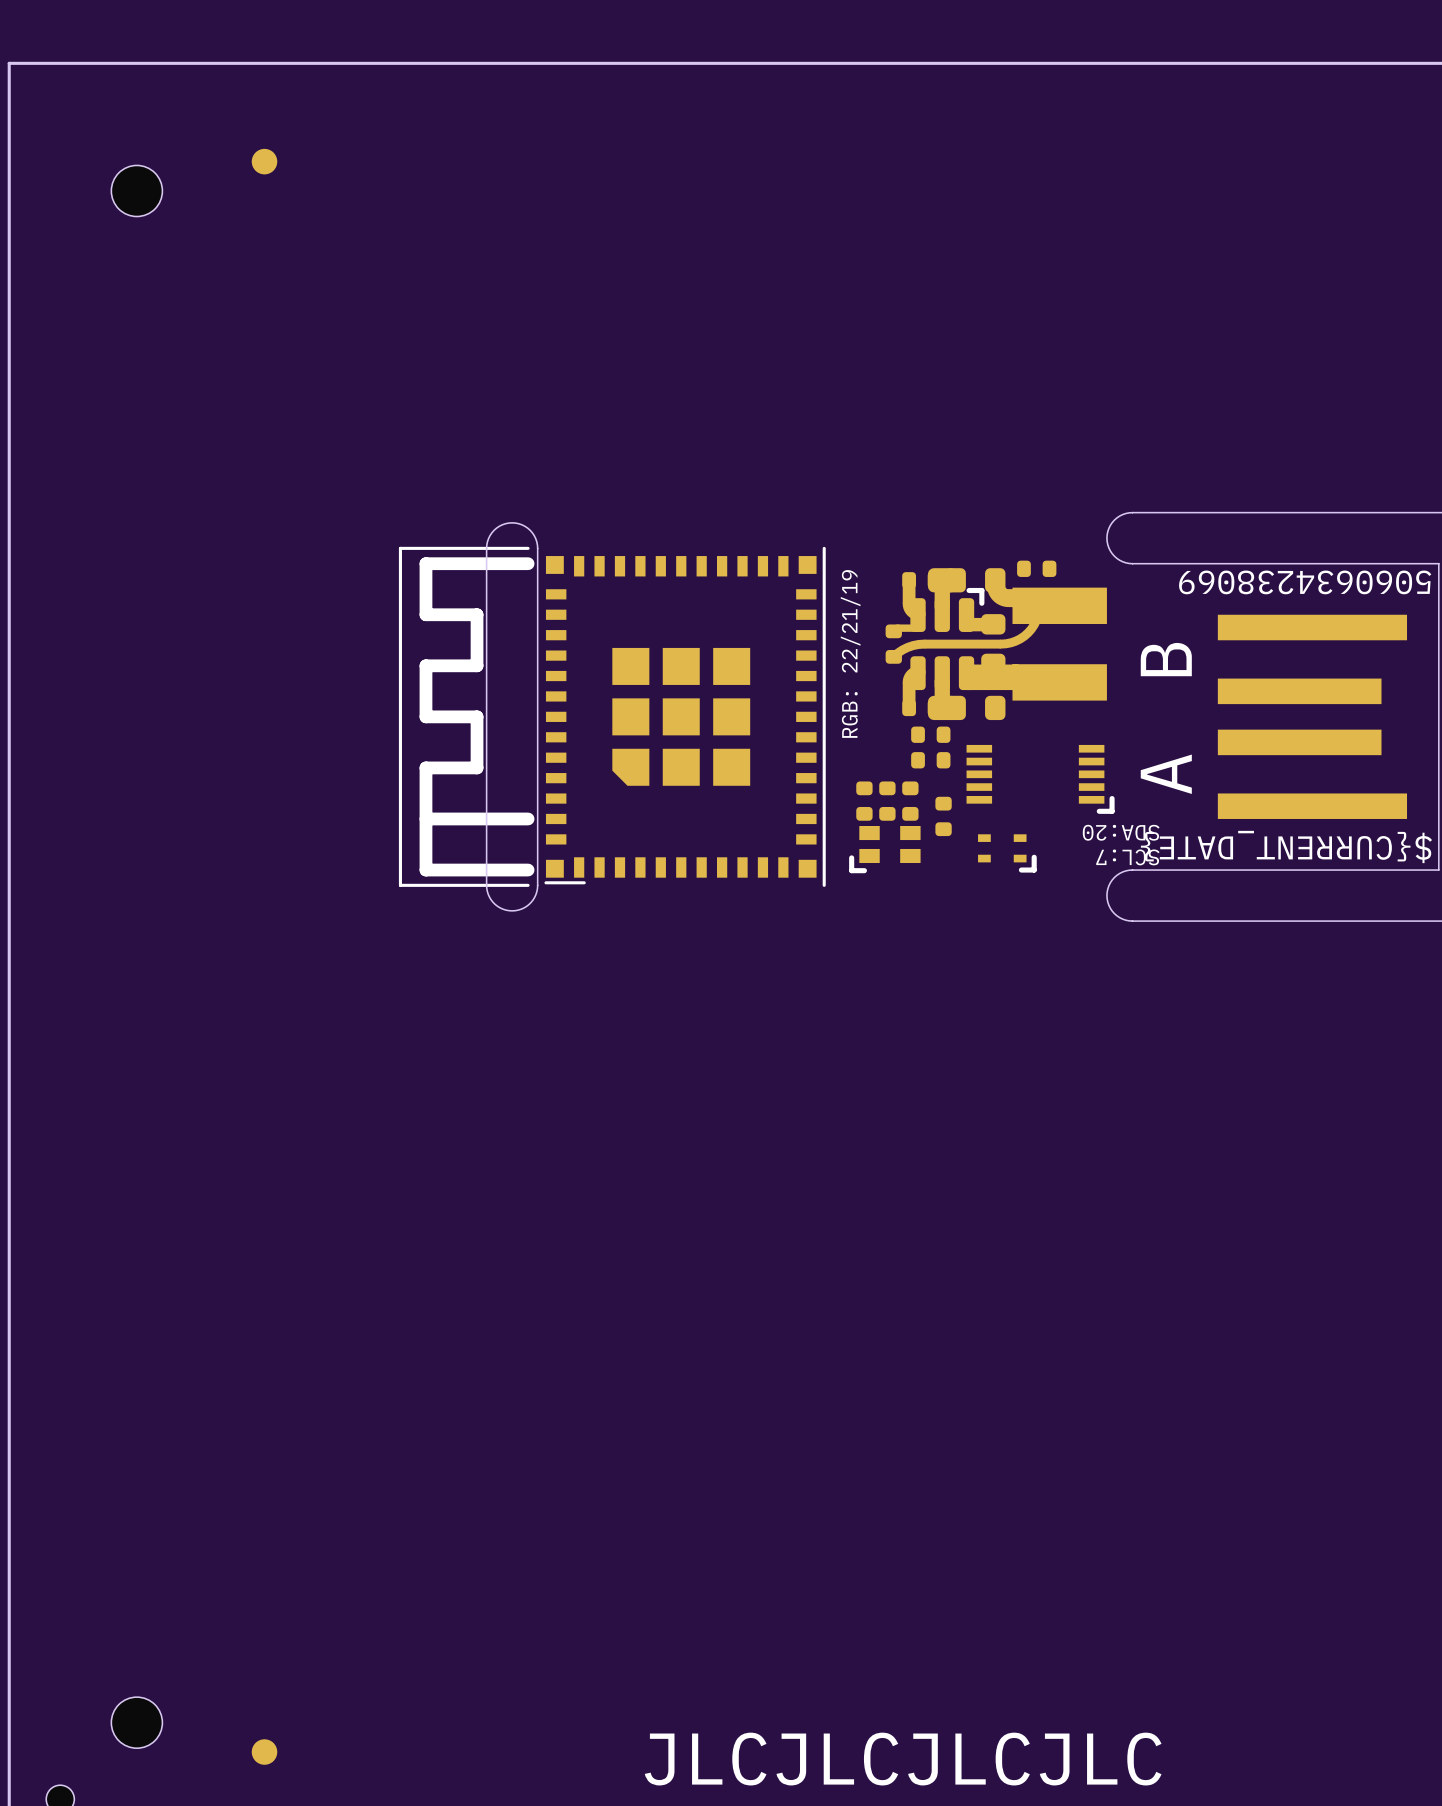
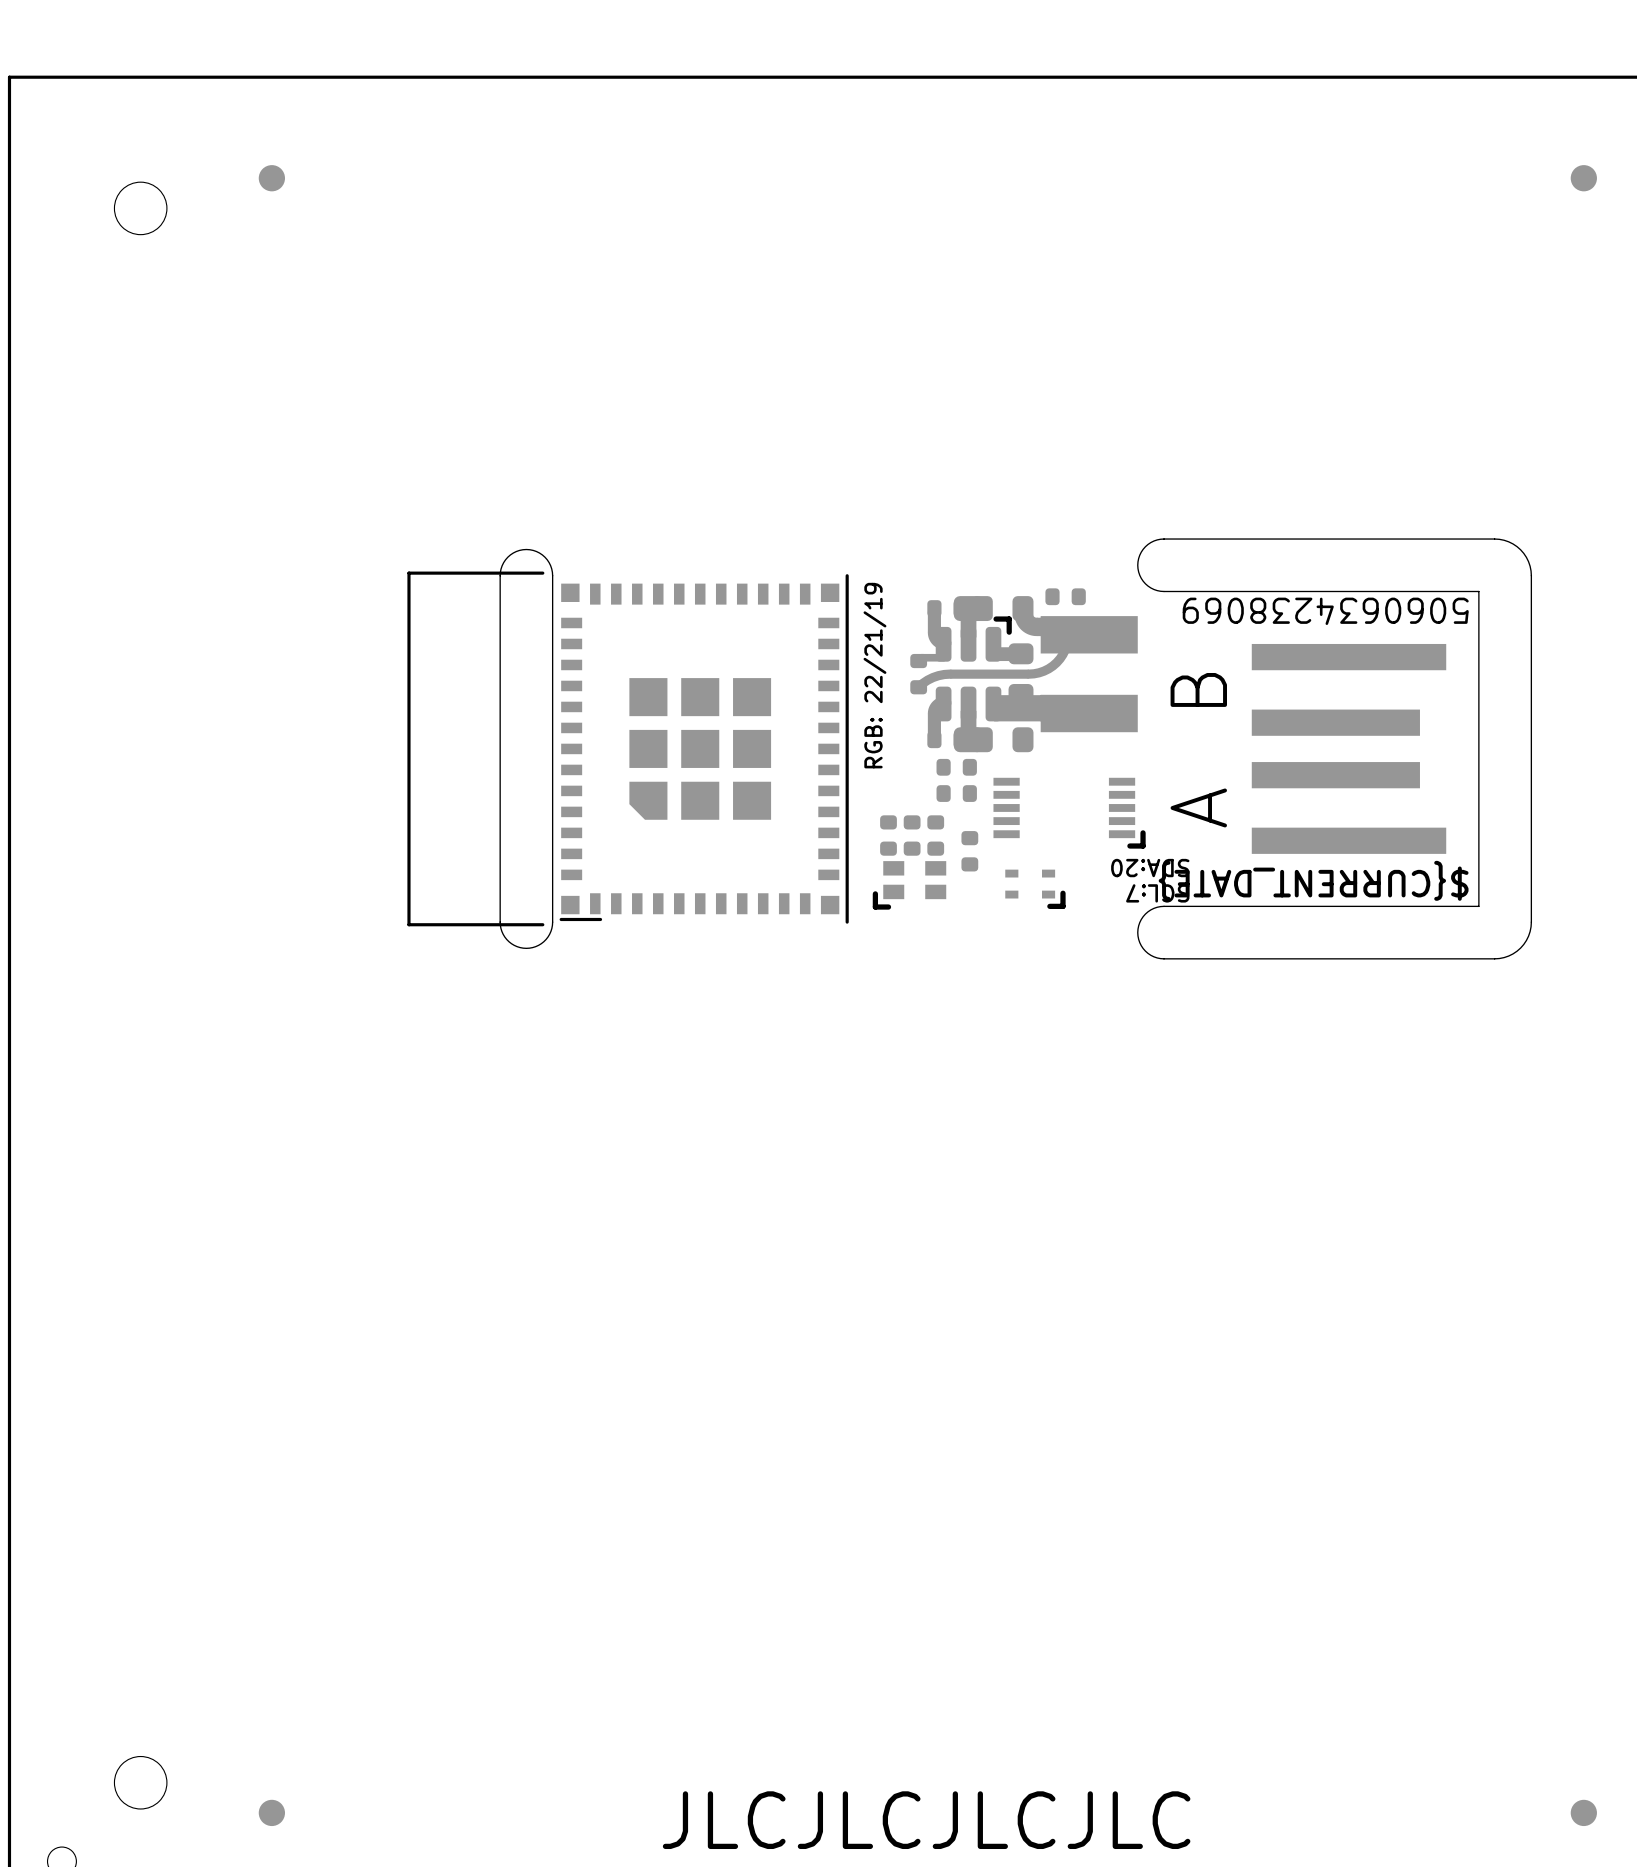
part footprint: [398, 546, 826, 887] -> [407, 571, 849, 927]

